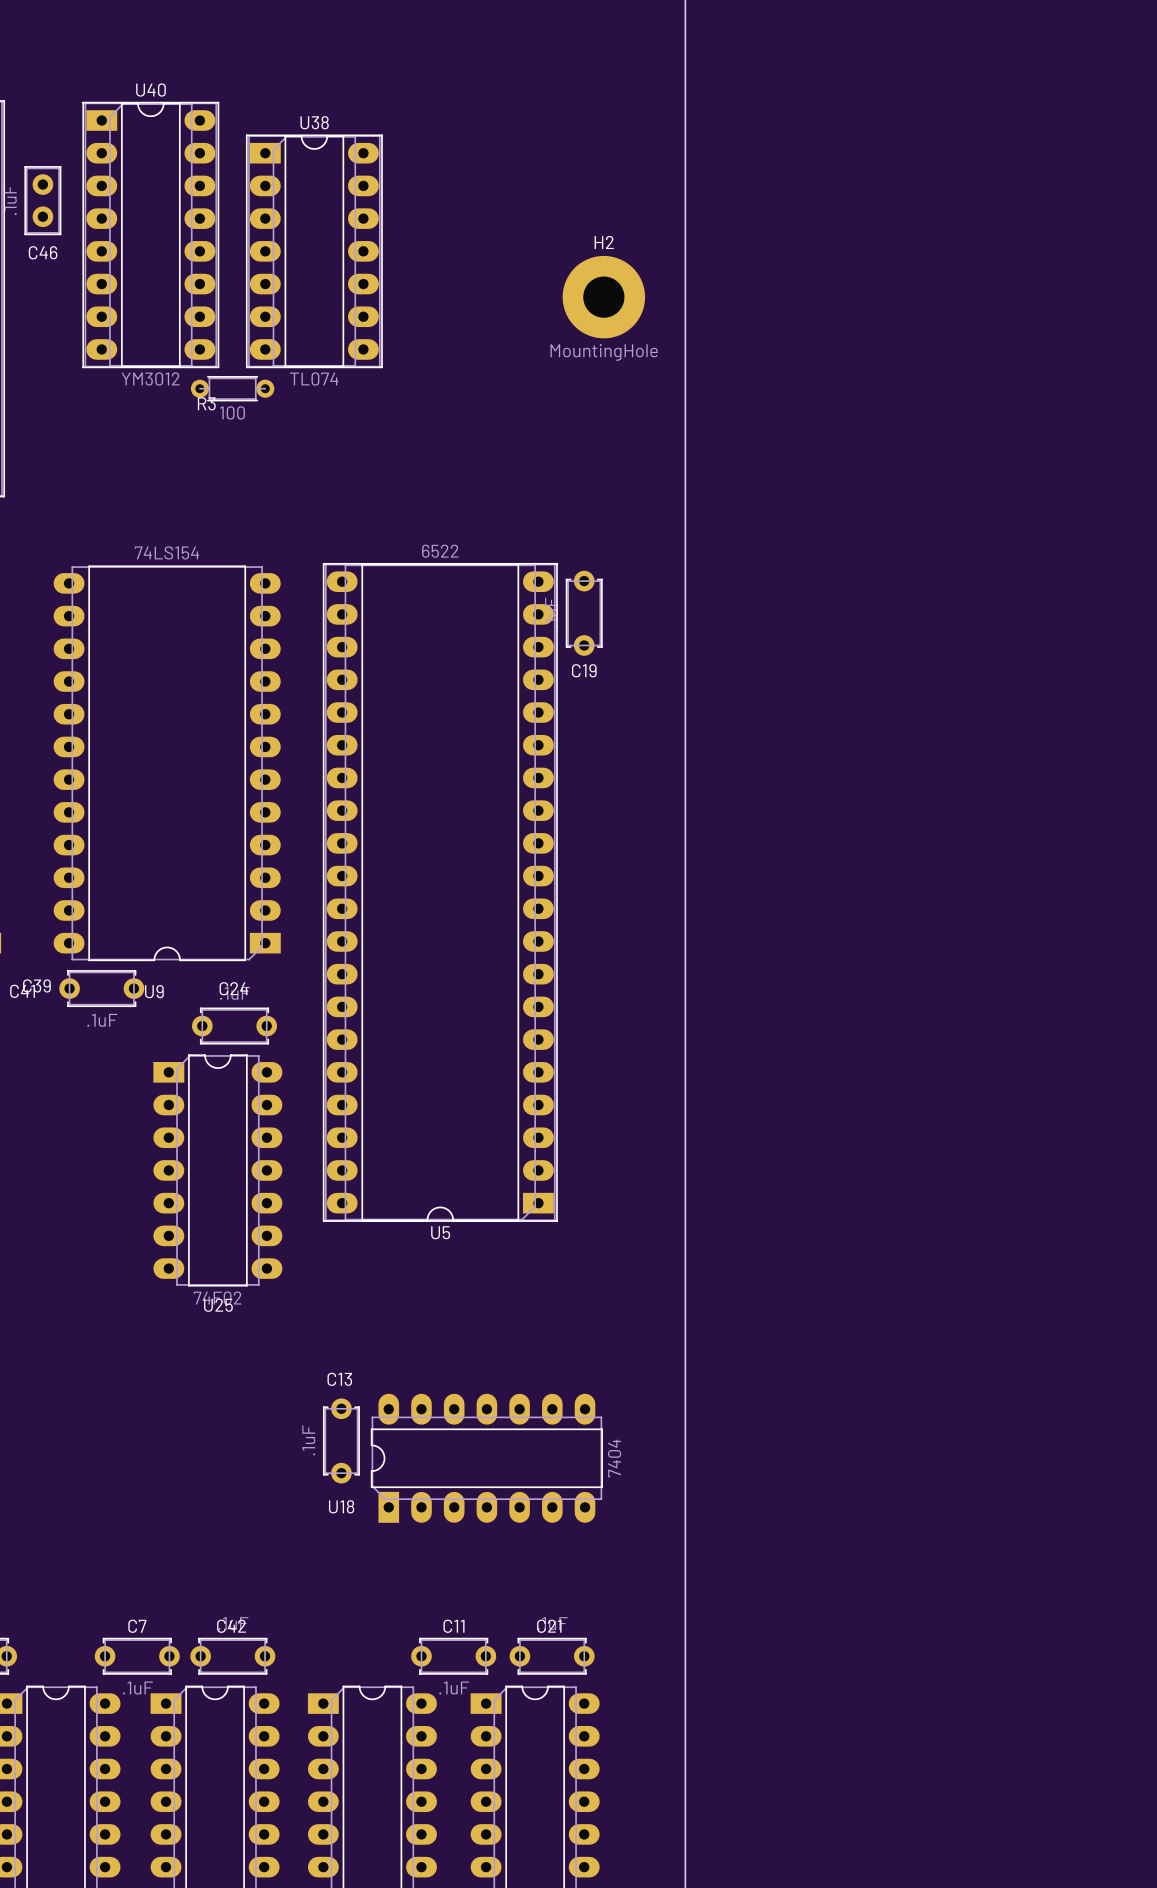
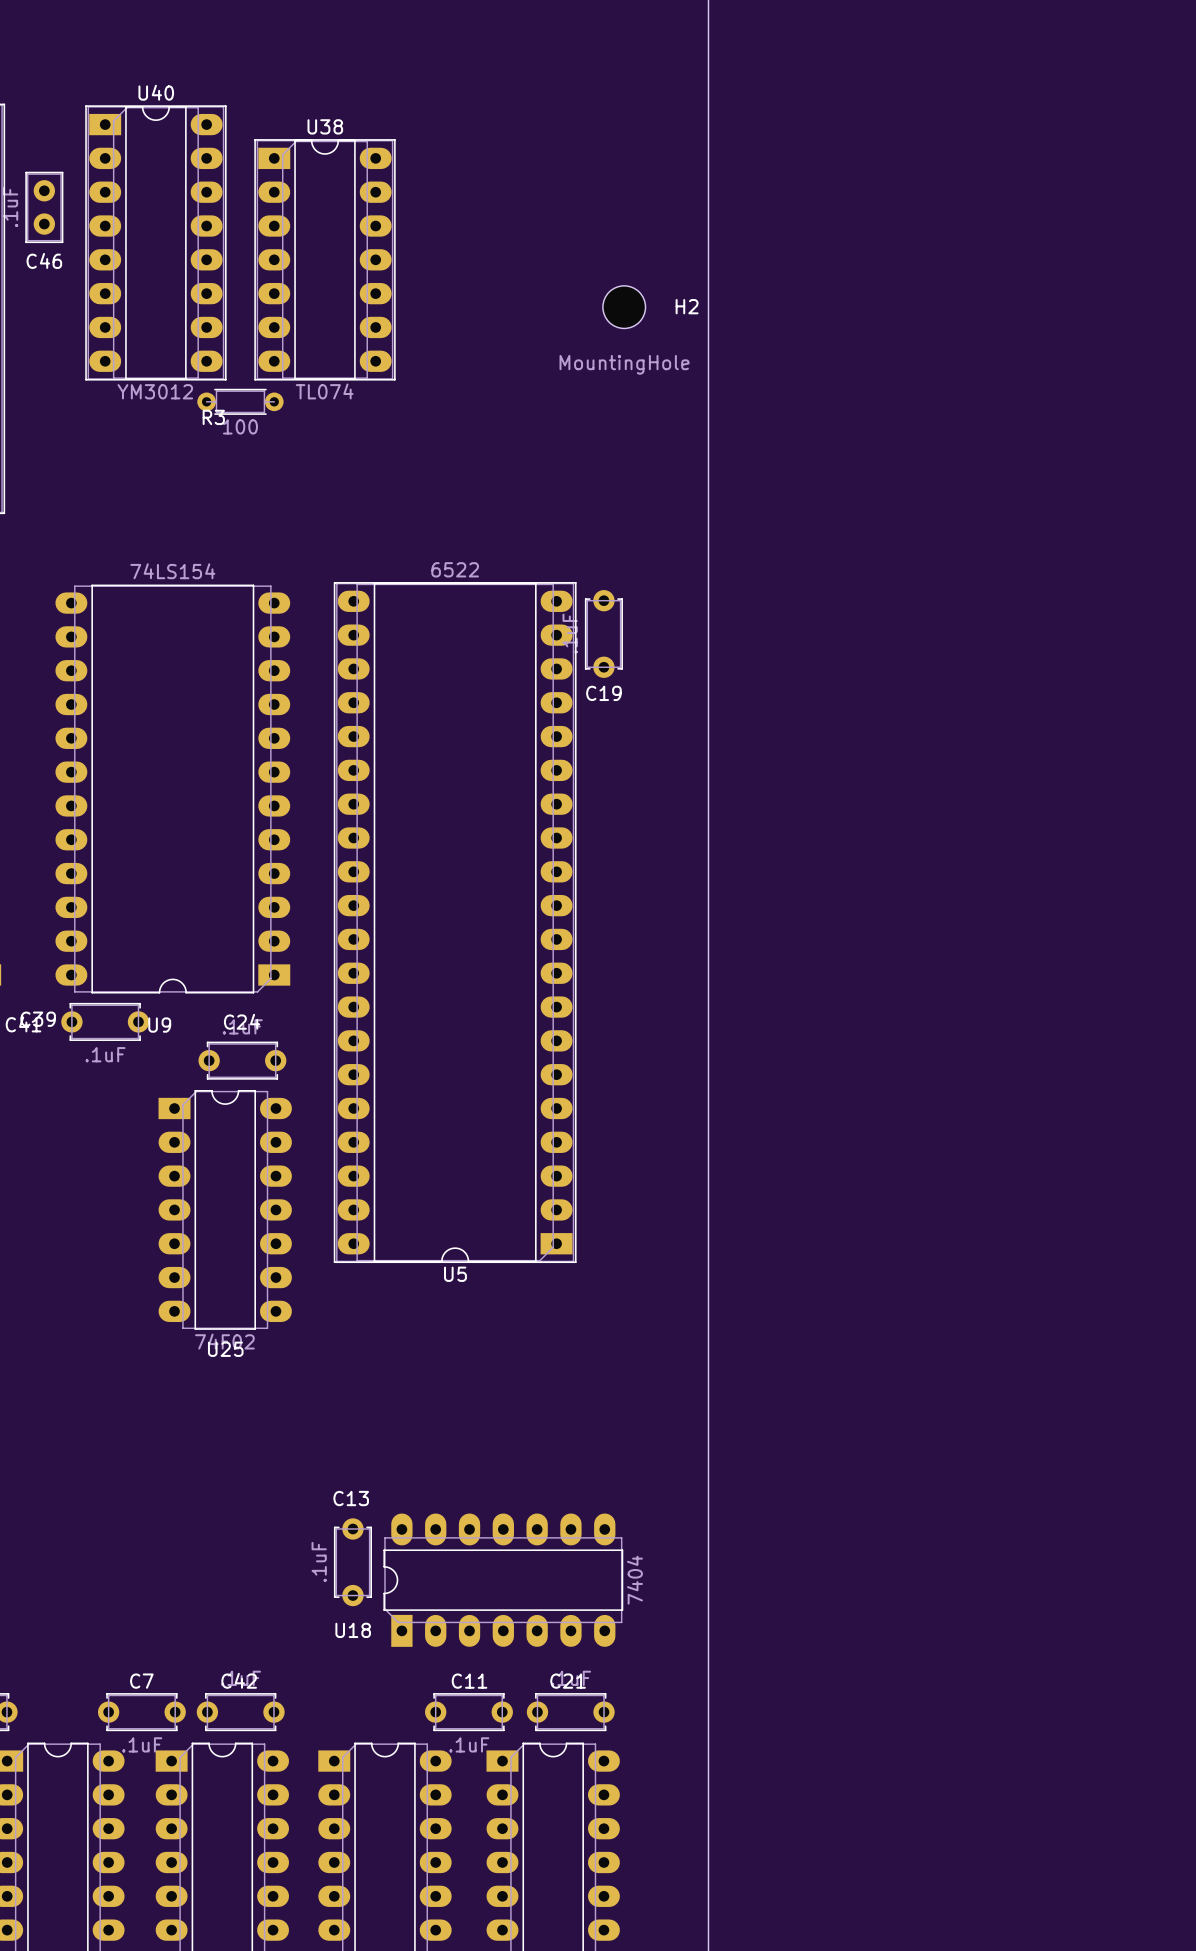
H2 name position: H2 (604, 242) -> H2 (687, 306)
H2 footprint: [562, 255, 646, 339] -> [602, 285, 646, 329]
C13 position: (341, 1440) -> (352, 1562)
U18 position: (486, 1458) -> (503, 1580)

